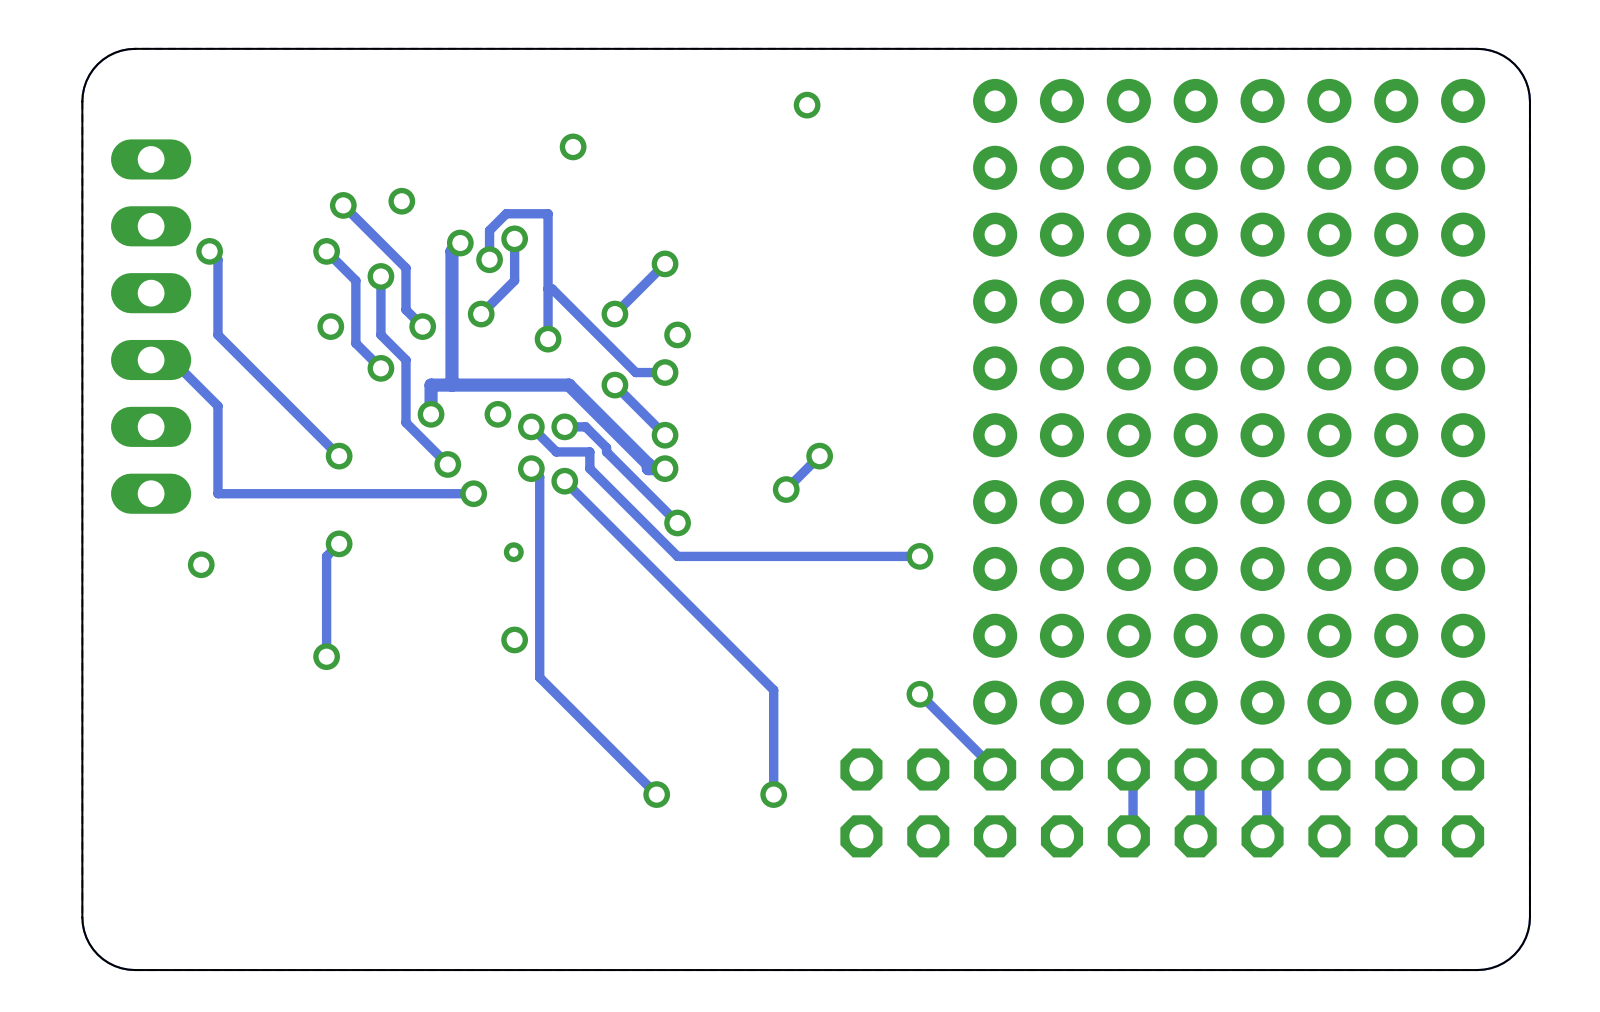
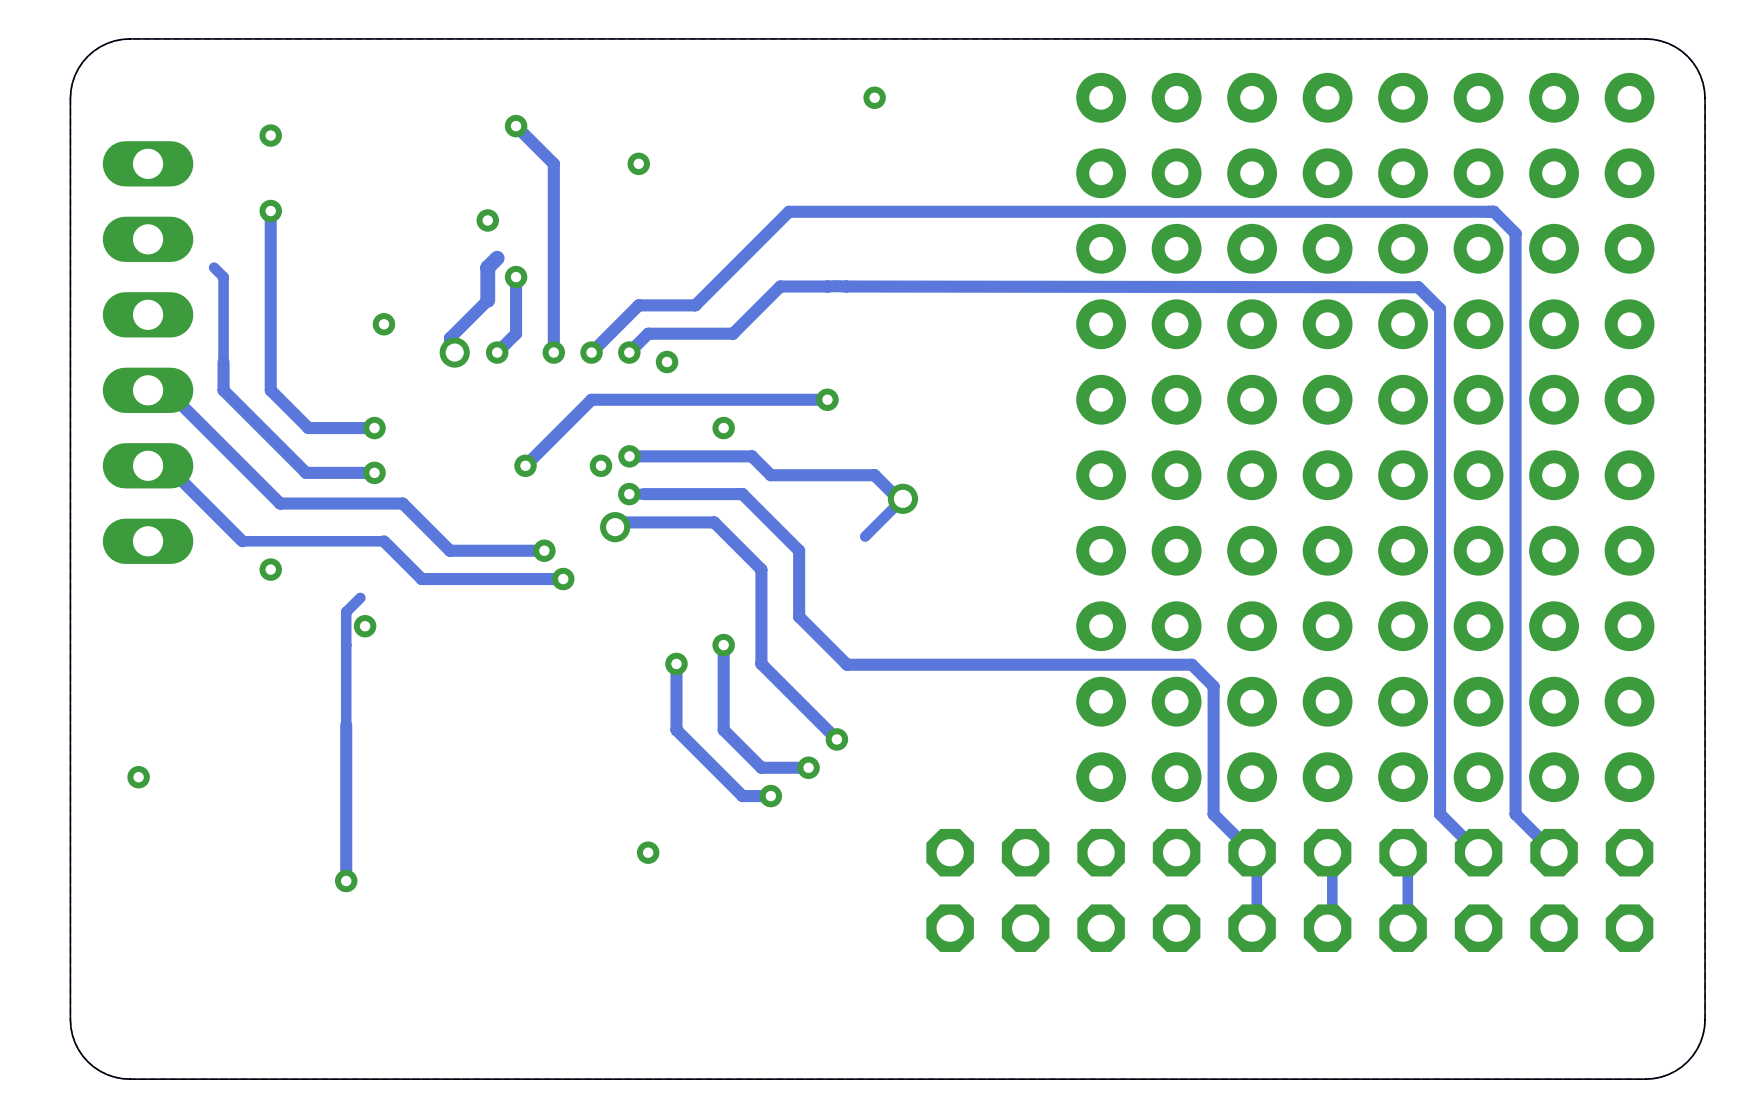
via size: [793, 91, 821, 119] -> [863, 86, 886, 110]
track: none -> (516, 126) (553, 163) (553, 352)
via: none -> (516, 126)
via: none -> (270, 135)
via position: (573, 146) -> (638, 163)
track: none -> (270, 211) (270, 390) (308, 428) (374, 428)
via: none -> (270, 211)
via: (401, 201) -> none
track: (343, 205) (405, 268) (405, 309) (422, 326) -> none
via: (343, 205) -> none
via: none -> (487, 220)
track: (514, 238) (514, 280) (481, 314) -> none
via: (514, 238) -> none
via: (460, 243) -> none
via: (209, 251) -> none
track: (326, 251) (355, 280) (355, 343) (380, 368) -> none
via: (326, 251) -> none
track: none -> (516, 277) (516, 333) (497, 352)
via: none -> (516, 277)
track: (489, 259) (489, 230) (506, 213) (548, 213) (548, 339) -> none
via: (489, 259) -> none
track: (665, 263) (614, 314) -> none
via: (665, 263) -> none
track: (380, 276) (380, 334) (405, 360) (405, 422) (447, 464) -> none
via: (380, 276) -> none
track: (451, 280) (451, 385) -> (487, 300) (450, 338) (450, 352)
track: (548, 288) (552, 288) (635, 372) (665, 372) -> none
via: none -> (383, 324)
via position: (481, 314) -> (497, 352)
via position: (614, 314) -> (667, 362)
via size: [534, 325, 562, 353] -> [580, 341, 603, 364]
via: (330, 326) -> none
via: none -> (553, 352)
track: none -> (591, 352) (638, 305) (695, 305) (788, 211) (1493, 211) (1515, 233) (1515, 814) (1554, 852)
track: none -> (629, 352) (648, 333) (733, 333) (780, 286) (1418, 287) (1440, 308) (1440, 814) (1478, 852)
via: none -> (629, 352)
track: (217, 334) (339, 456) -> (223, 362) (223, 390) (306, 472) (374, 472)
via: (677, 334) -> none
track: none -> (157, 380) (280, 503) (402, 503) (450, 550) (544, 550)
track: (151, 360) (172, 360) (217, 405) (217, 493) (234, 493) -> (157, 456) (242, 541)
via: (380, 368) -> none
track: none -> (827, 399) (591, 399) (525, 465)
via: none -> (827, 399)
via position: (665, 372) -> (723, 428)
track: (614, 385) (665, 435) -> none
via: (614, 385) -> none
via: none -> (374, 428)
track: (431, 414) (431, 385) (568, 385) (648, 464) (648, 468) (665, 468) -> none
via: (431, 414) -> none
via position: (497, 414) -> (525, 465)
track: none -> (629, 456) (751, 456) (770, 475) (874, 475) (893, 494)
via: none -> (629, 456)
track: (531, 426) (556, 451) (577, 451) -> none
via: (531, 426) -> none
via: none -> (600, 465)
track: (564, 426) (585, 426) (606, 447) (606, 451) (677, 522) -> none
via: (564, 426) -> none
via: (665, 435) -> none
via: none -> (629, 494)
track: (589, 451) (589, 468) (677, 556) (919, 556) -> (643, 494) (742, 494) (799, 550) (799, 616) (847, 664) (1191, 664) (1213, 686) (1213, 814) (1252, 852)
via position: (339, 456) -> (374, 472)
via: (447, 464) -> none
track: (531, 468) (539, 477) (539, 677) (656, 794) -> none
via: (531, 468) -> none
via: (665, 468) -> none
track: none -> (610, 522) (714, 522) (761, 569) (761, 663) (836, 739)
track: (564, 481) (773, 690) (773, 794) -> none
via: (786, 489) -> none
track: (473, 493) (360, 493) -> (563, 579) (421, 579) (383, 541)
via: (473, 493) -> none
via: none -> (544, 550)
via: none -> (270, 569)
via: (677, 522) -> none
via: none -> (563, 579)
via: (339, 543) -> none
via: (513, 552) -> none
via: (919, 556) -> none
via: (201, 564) -> none
via: none -> (365, 626)
track: none -> (723, 645) (723, 730) (761, 767) (808, 767)
via: none -> (723, 645)
track: none -> (676, 663) (676, 730) (742, 796) (770, 796)
via: none -> (676, 663)
via: (514, 639) -> none
track: none -> (346, 725) (346, 880)
via: (326, 656) -> none
via: none -> (836, 739)
via: none -> (808, 767)
track: (919, 694) (995, 769) -> none
via: (919, 694) -> none
via: none -> (138, 777)
via: none -> (770, 796)
via: none -> (648, 852)
via: none -> (346, 880)
via: (656, 794) -> none
via: (773, 794) -> none

